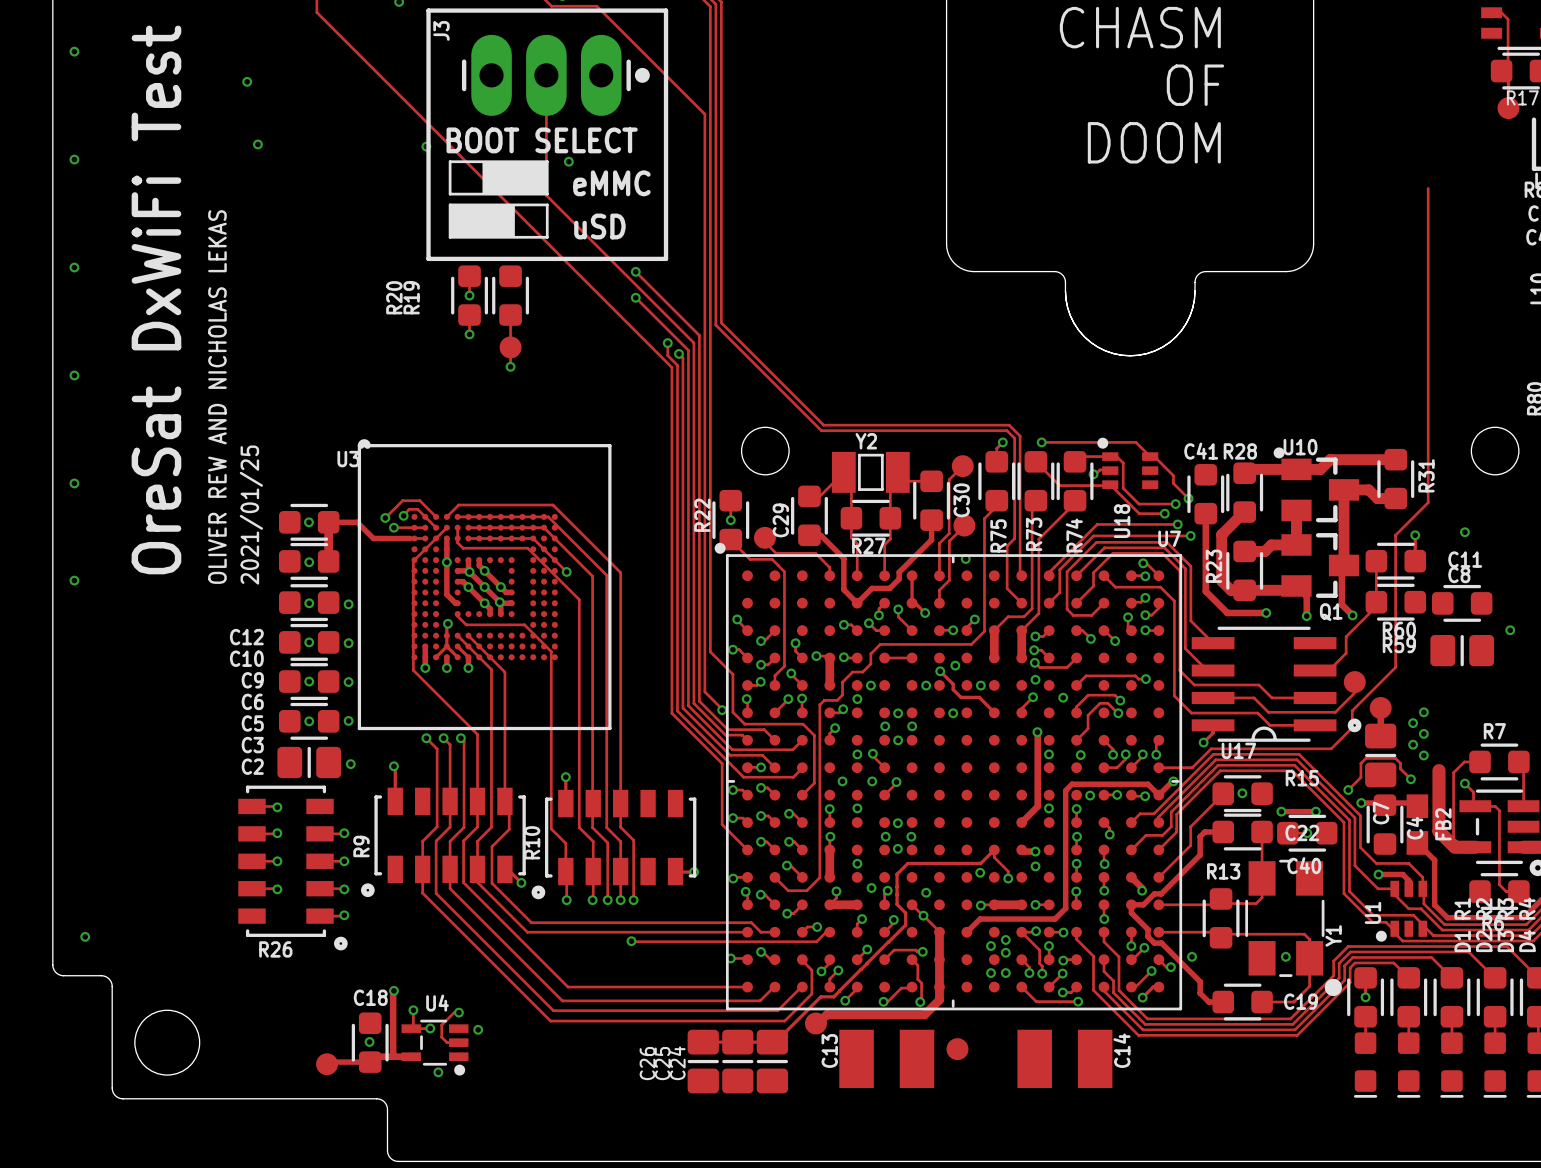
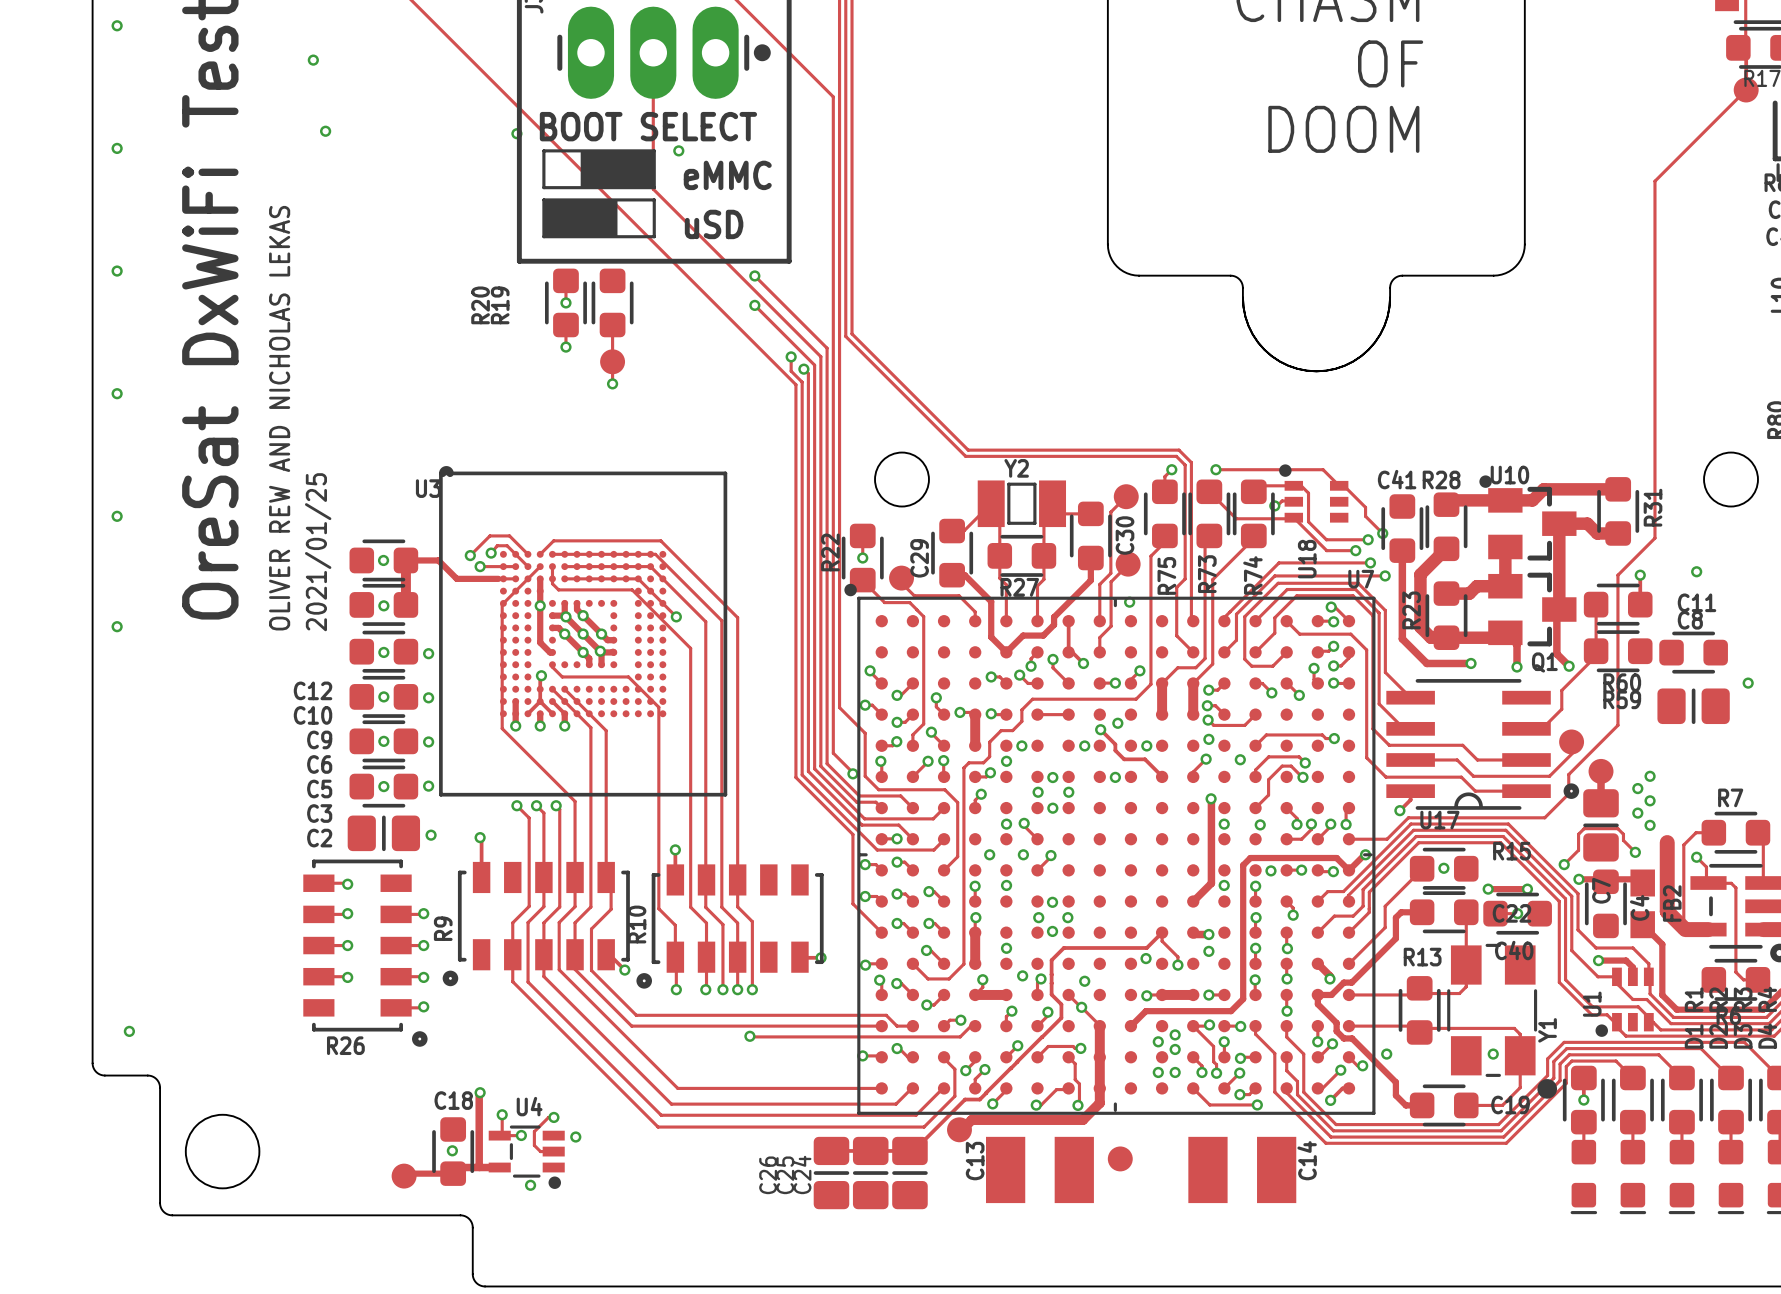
track: none -> (1746, 90) (1654, 181)

